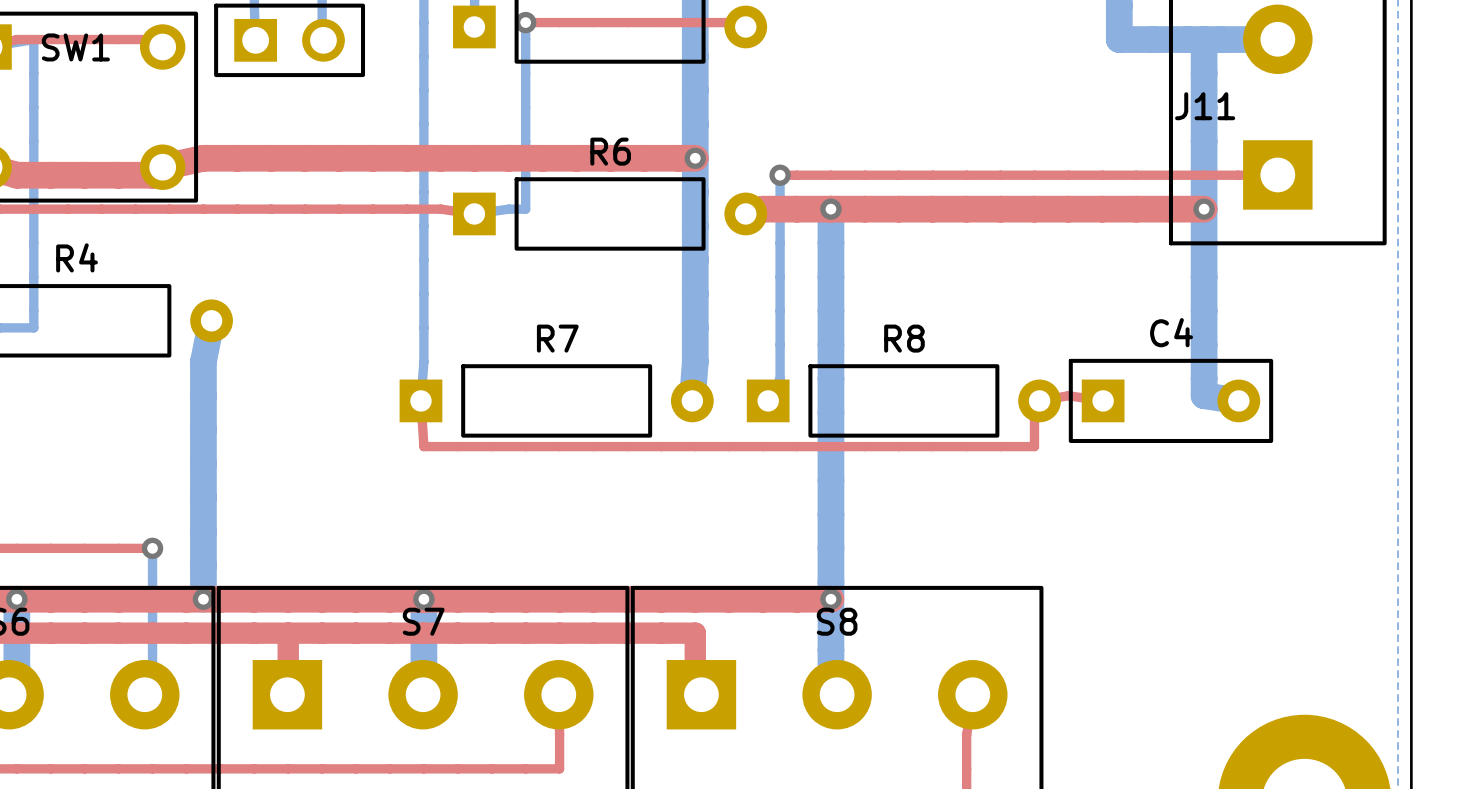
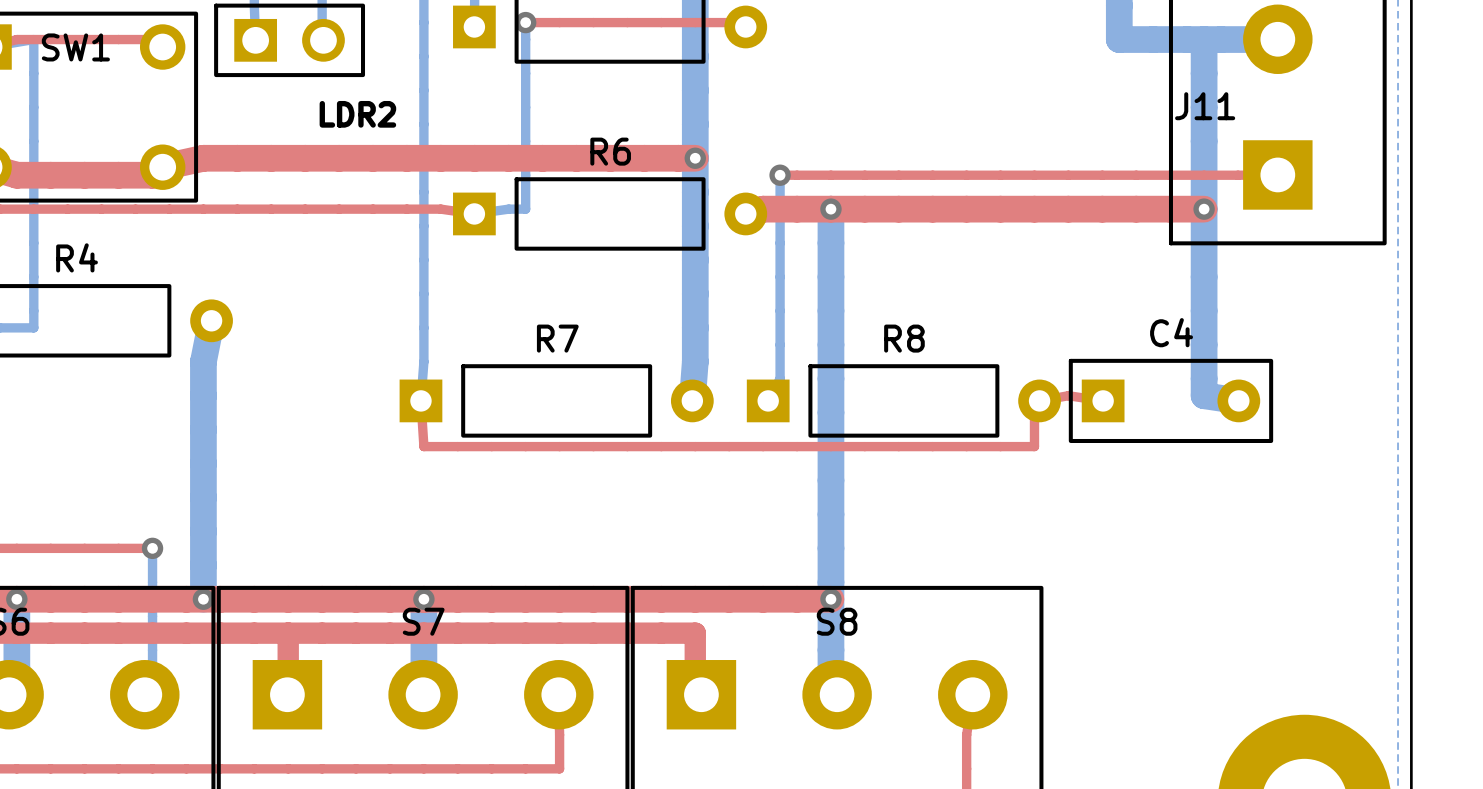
text: none -> LDR2 (357, 114)

